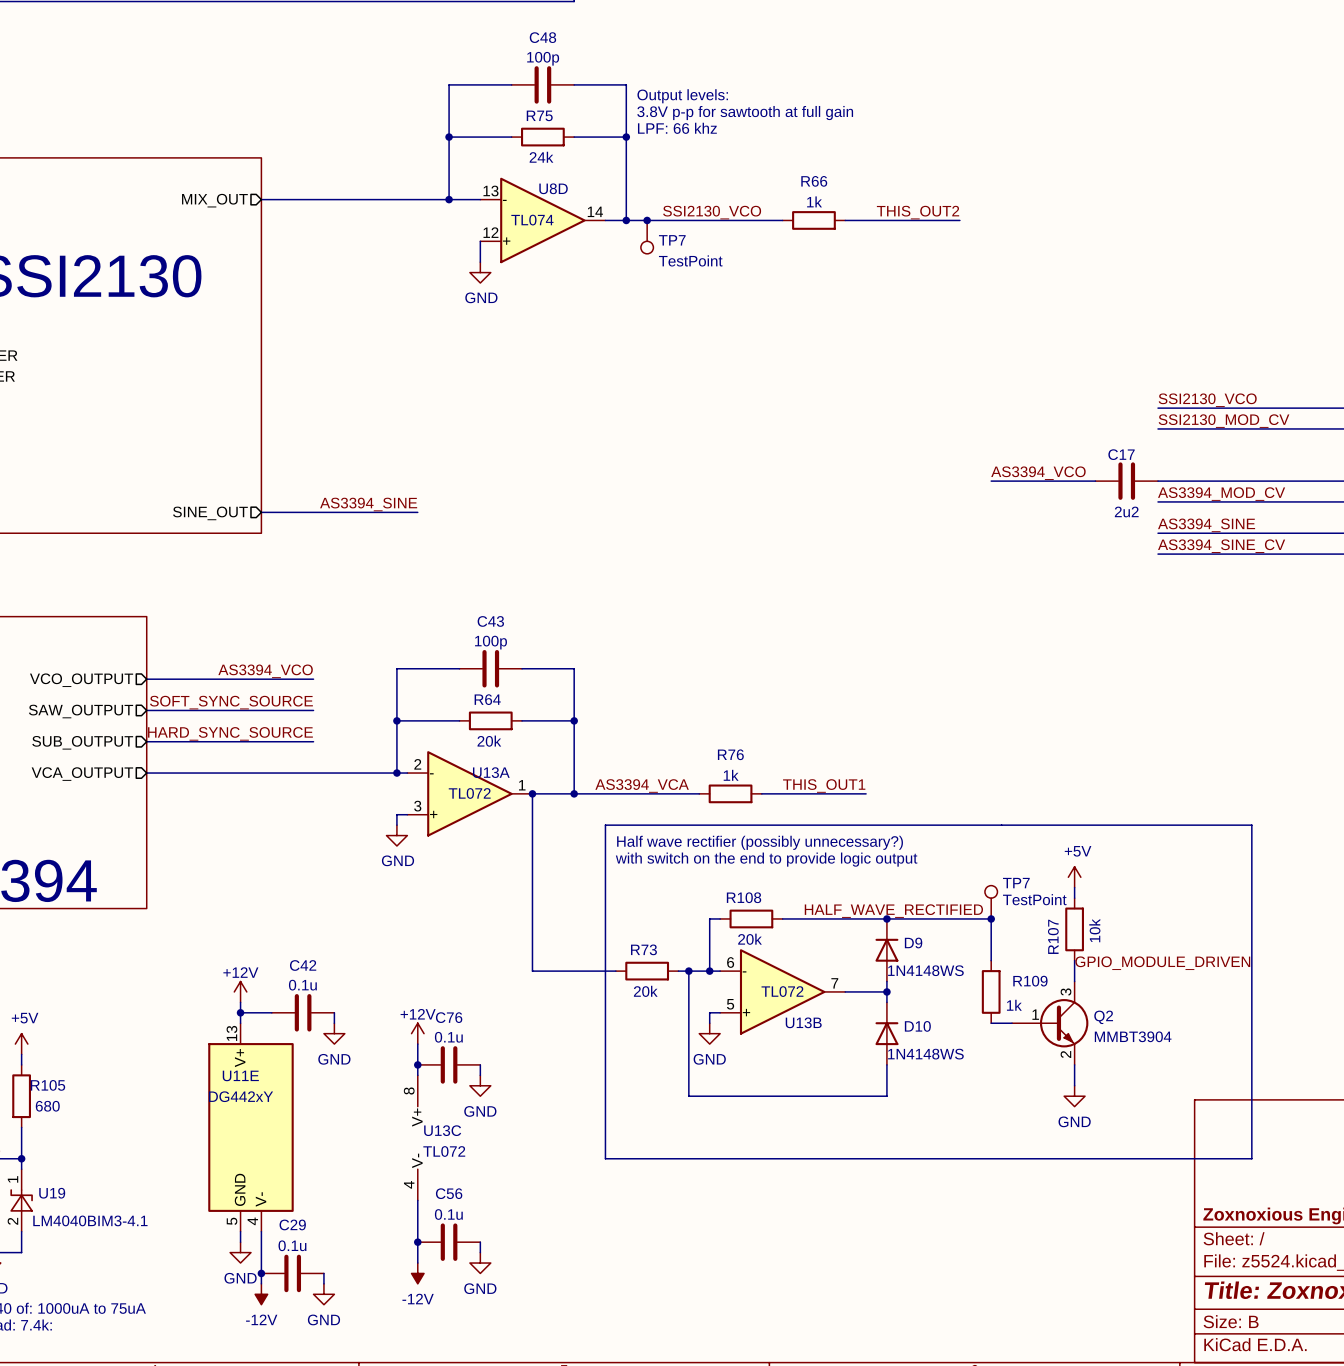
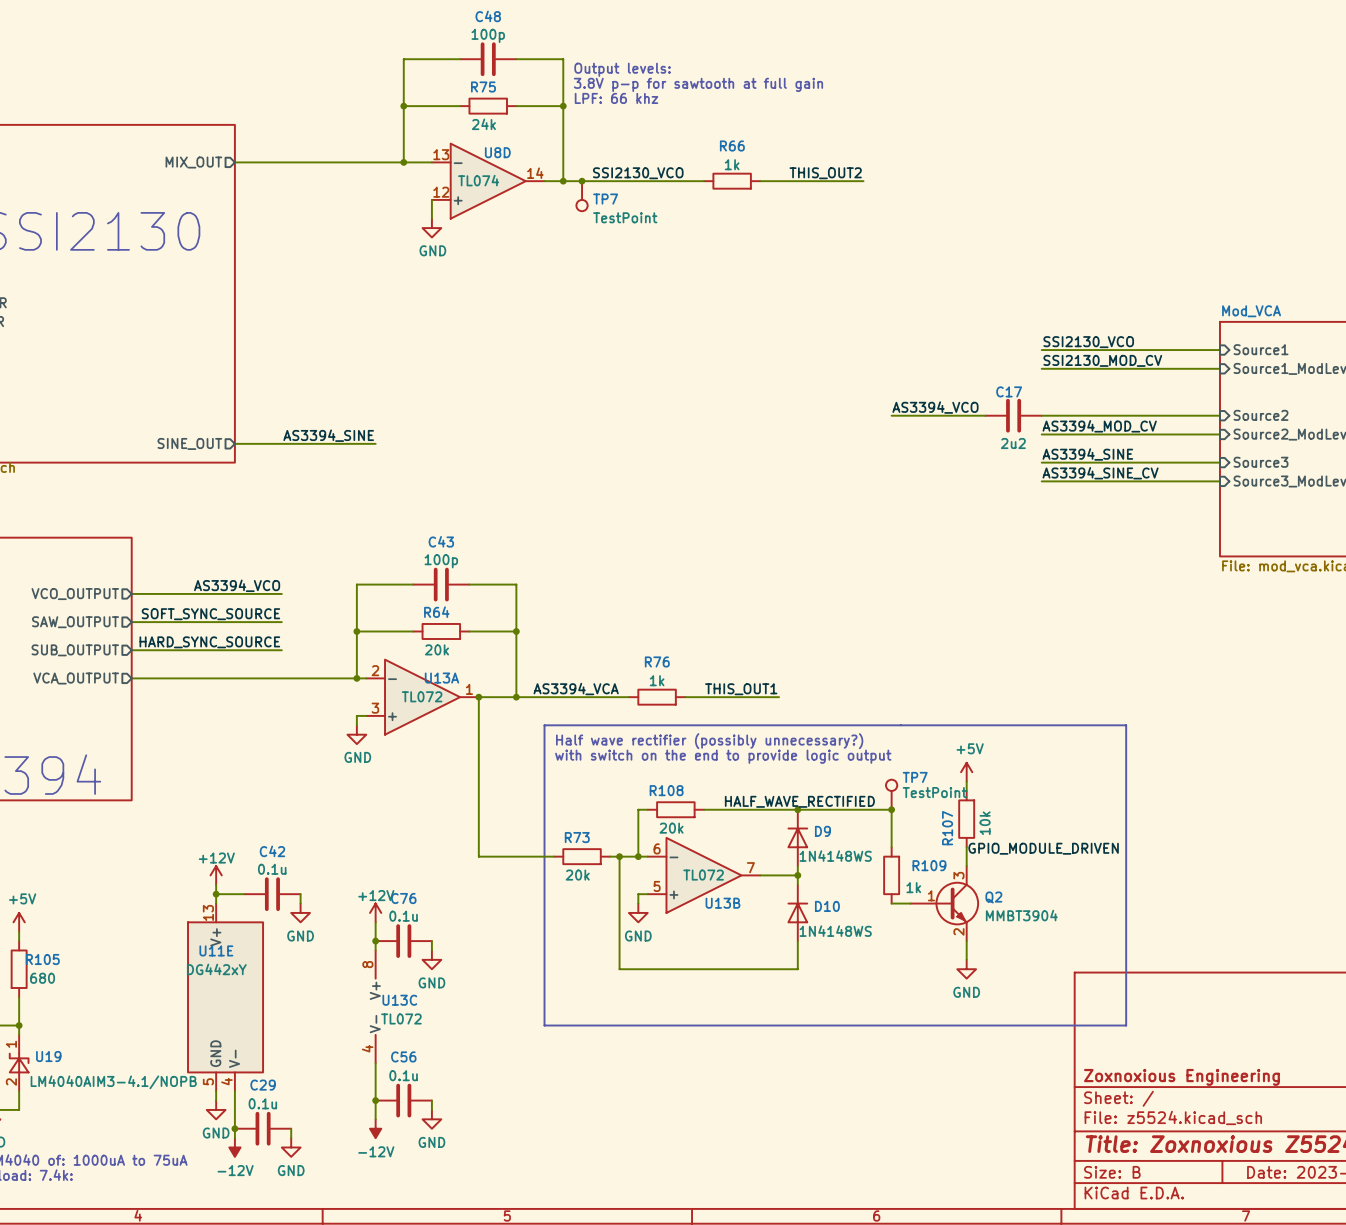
U19 value: LM4040BIM3-4.1 (90, 1220) -> LM4040AIM3-4.1/NOPB (113, 1082)

